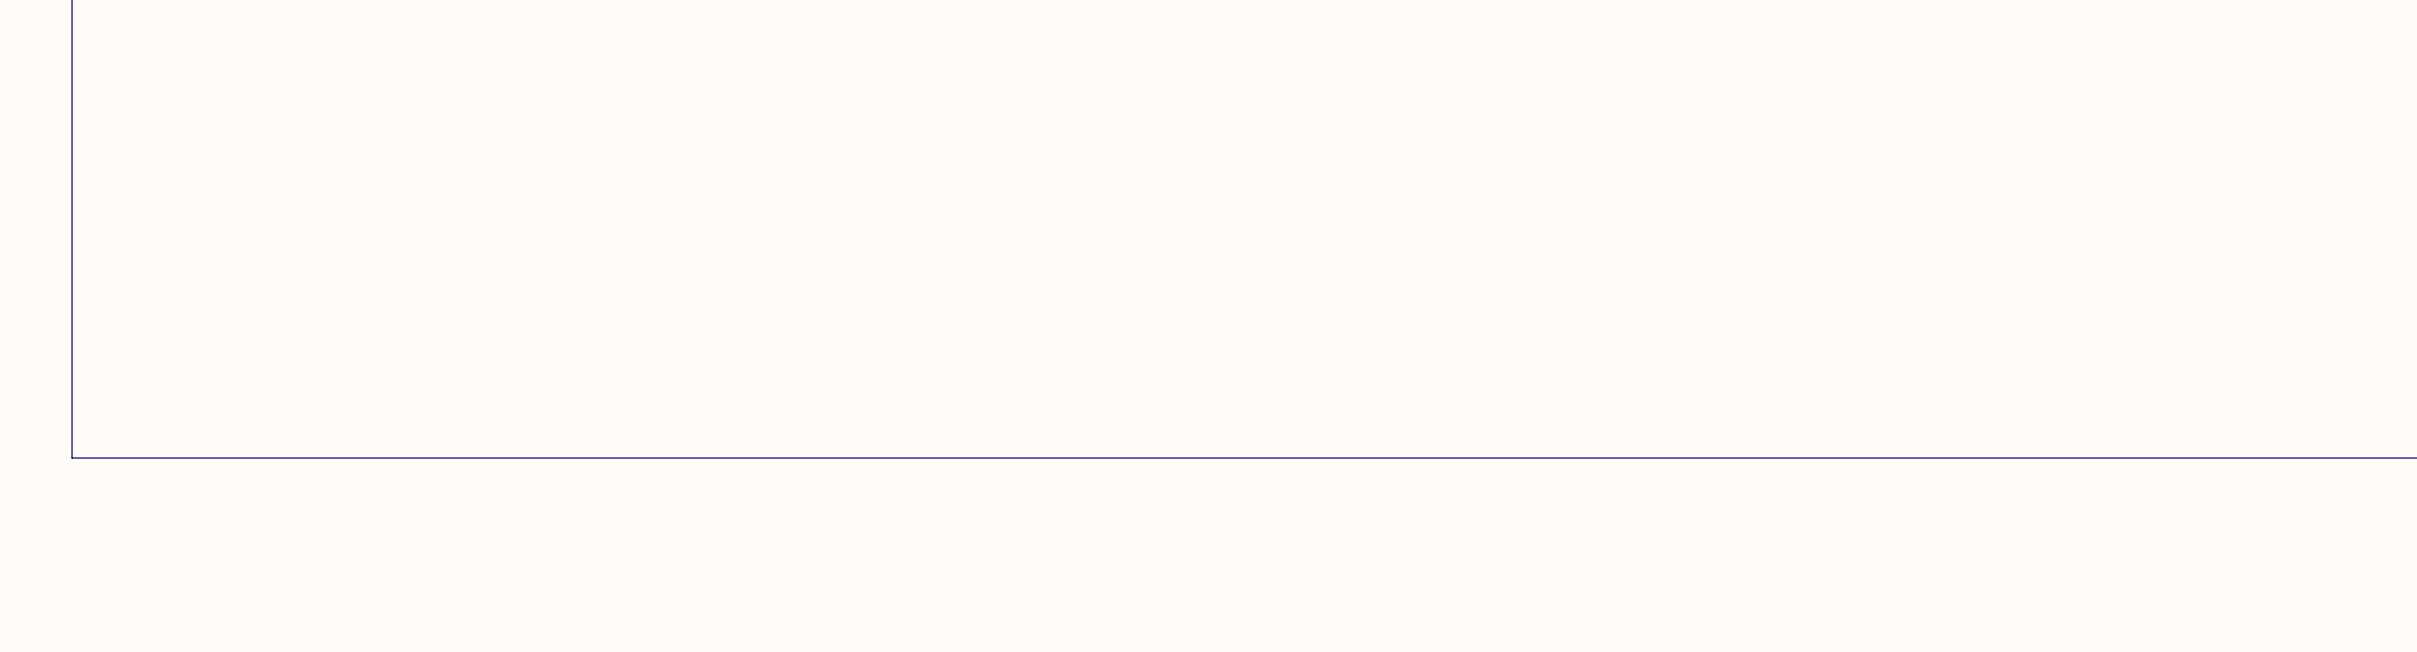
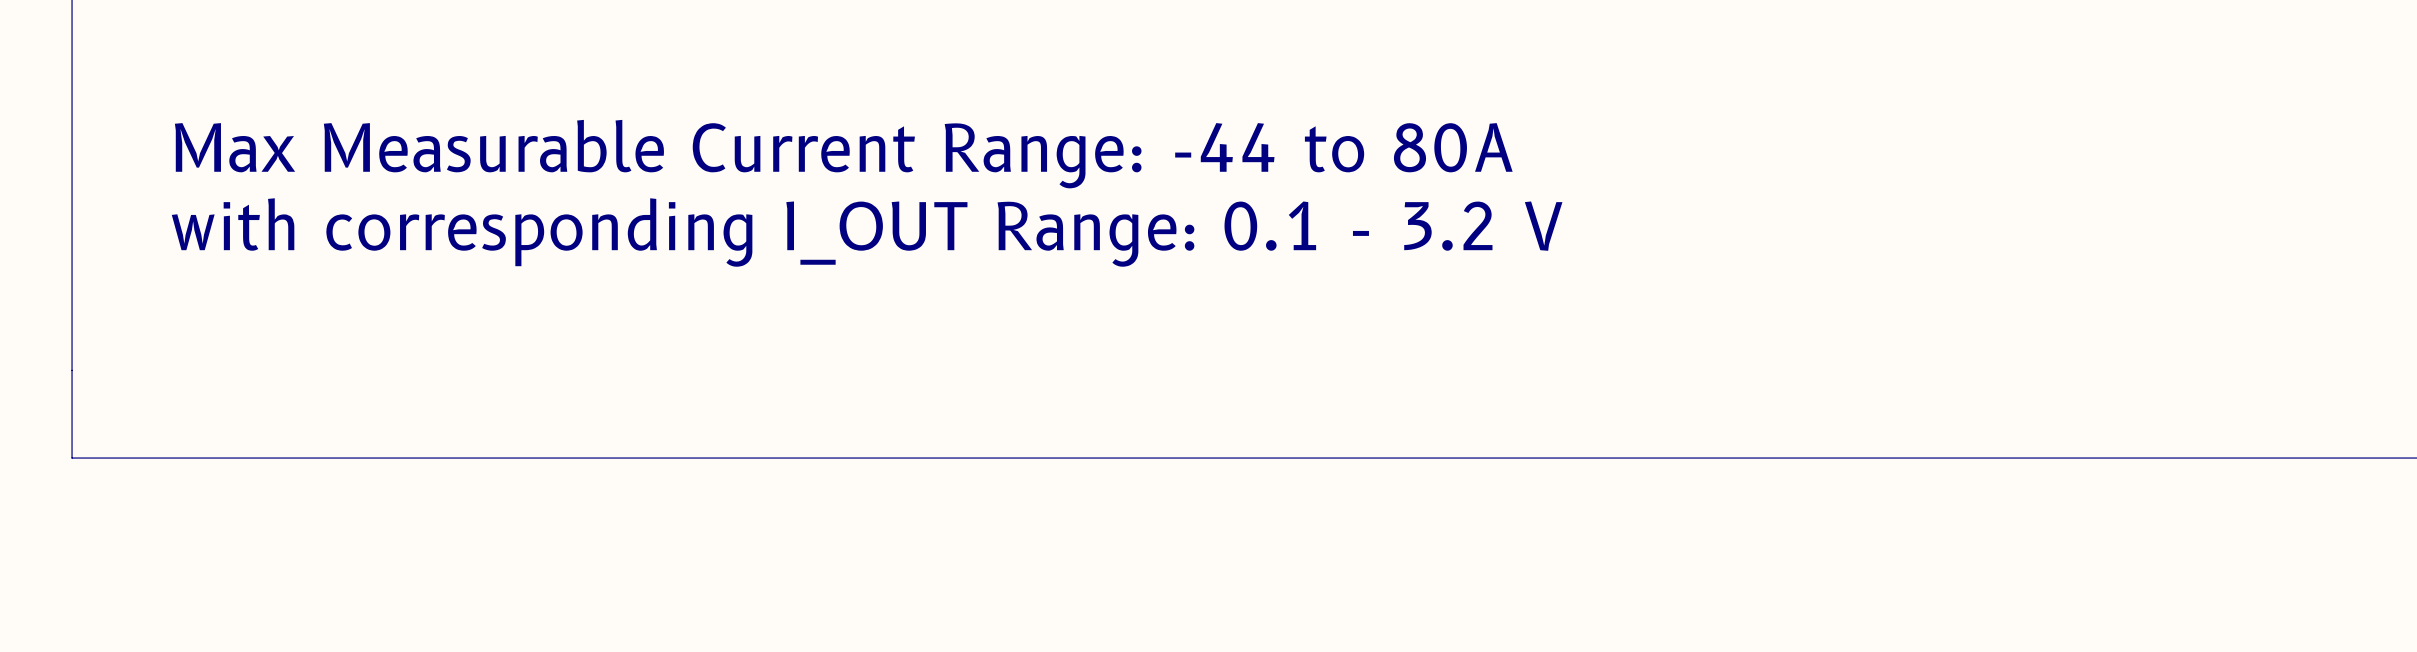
text: none -> Max Measurable Current Range: -44 to 80A (843, 154)
text: none -> with corresponding I_OUT Range: 0.1 - 3.2 V (867, 232)

